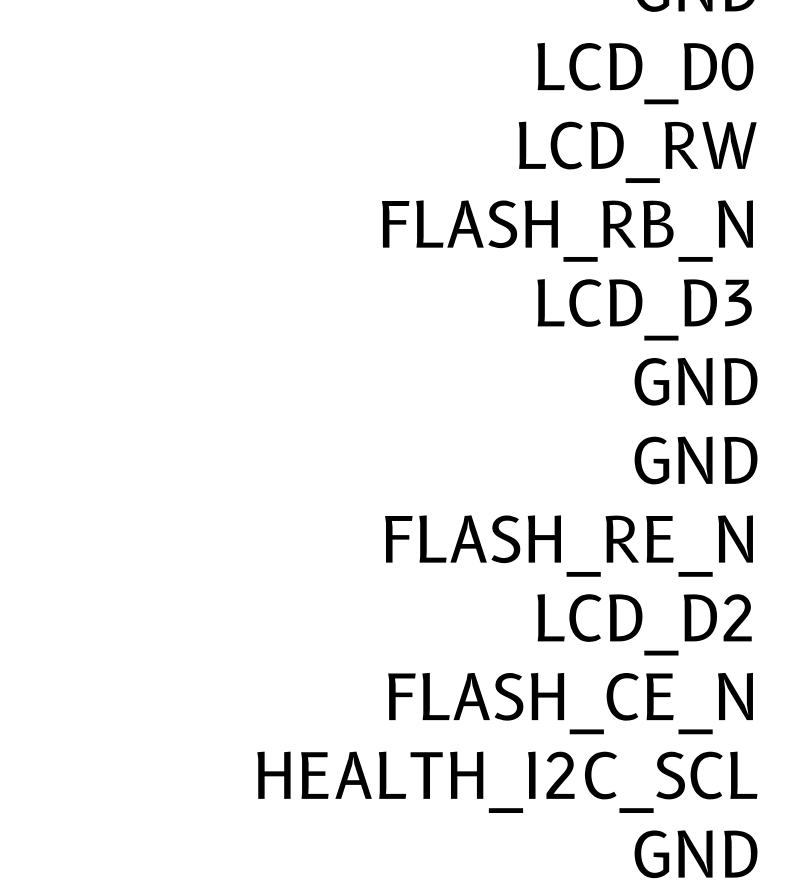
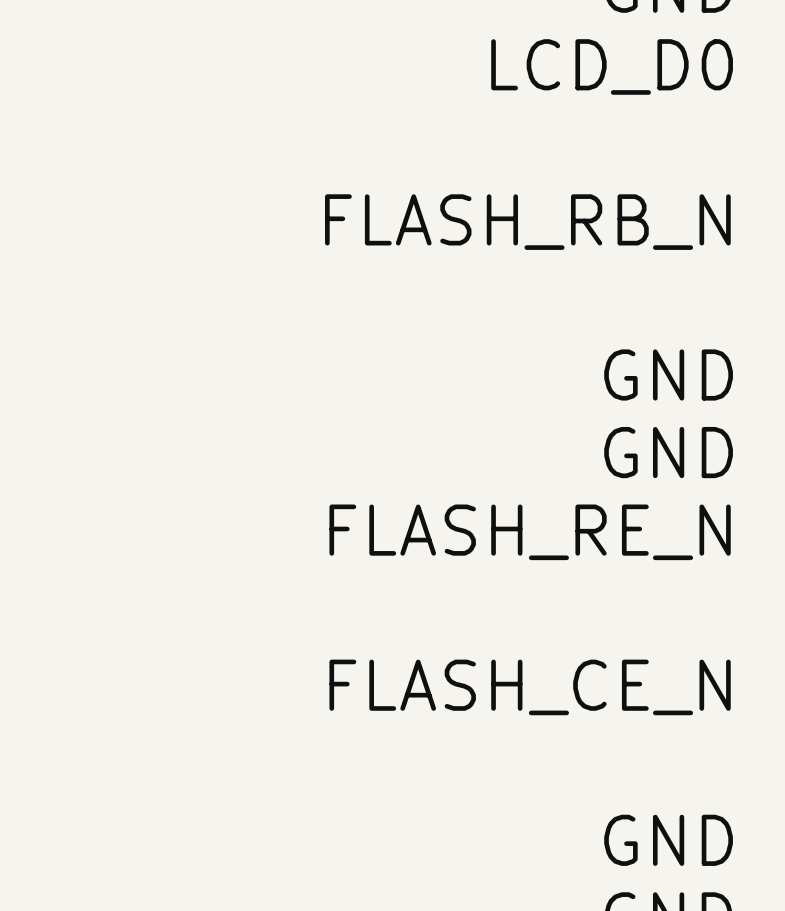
label: LCD_RW (637, 152) -> none
label: LCD_D3 (644, 309) -> none
label: LCD_D2 (644, 624) -> none
label: HEALTH_I2C_SCL (507, 782) -> none

